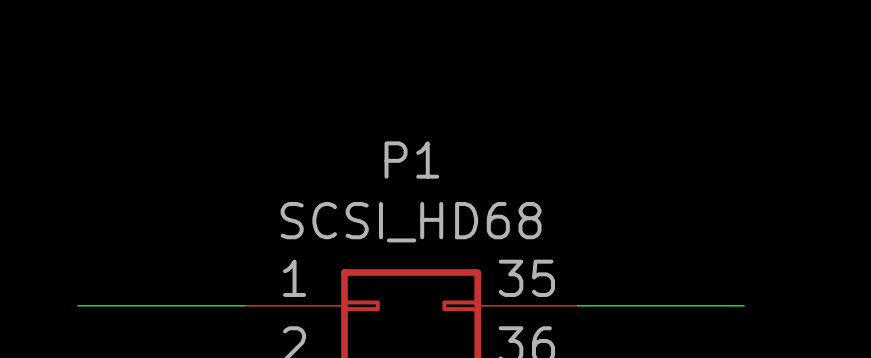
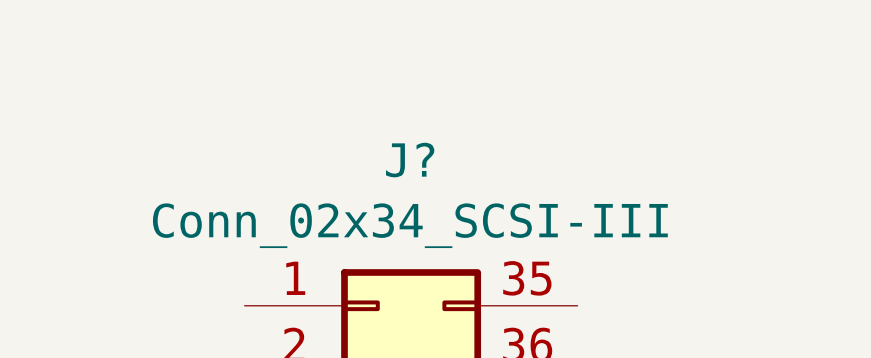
P1 name: P1 (411, 160) -> J? (410, 160)
P1 value: SCSI_HD68 (411, 222) -> Conn_02x34_SCSI-III (410, 225)
wire: (78, 305) (244, 305) -> none
wire: (577, 305) (744, 305) -> none

